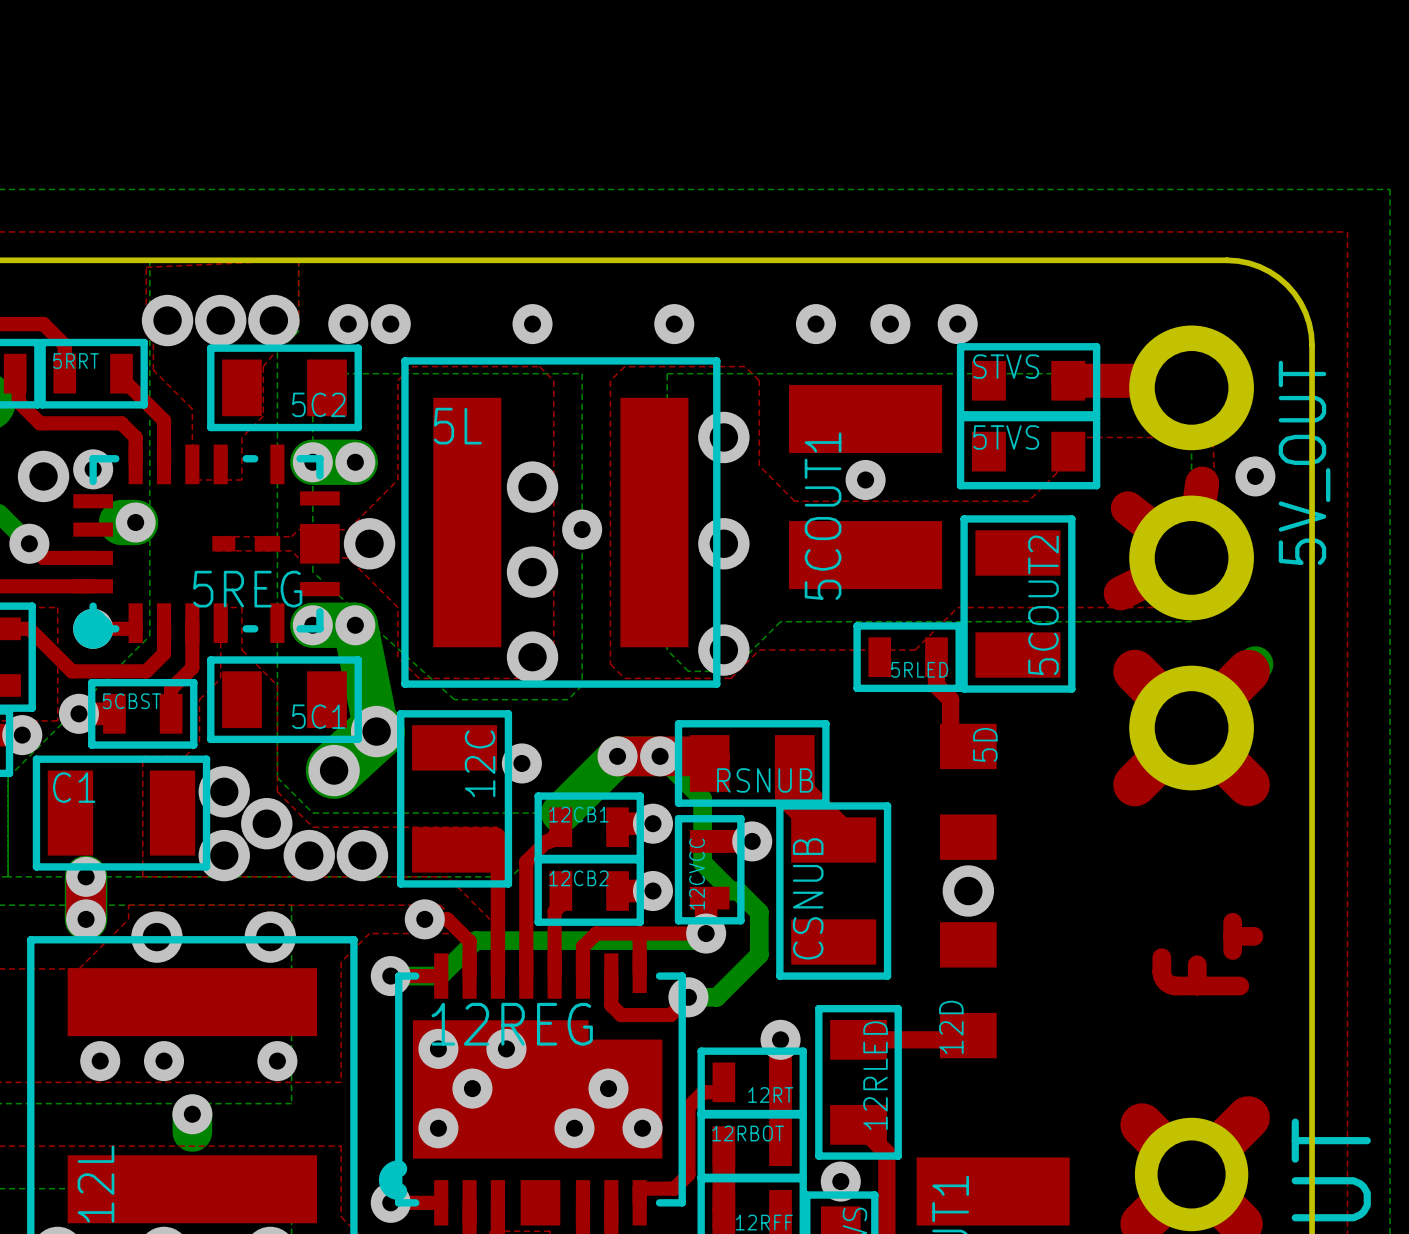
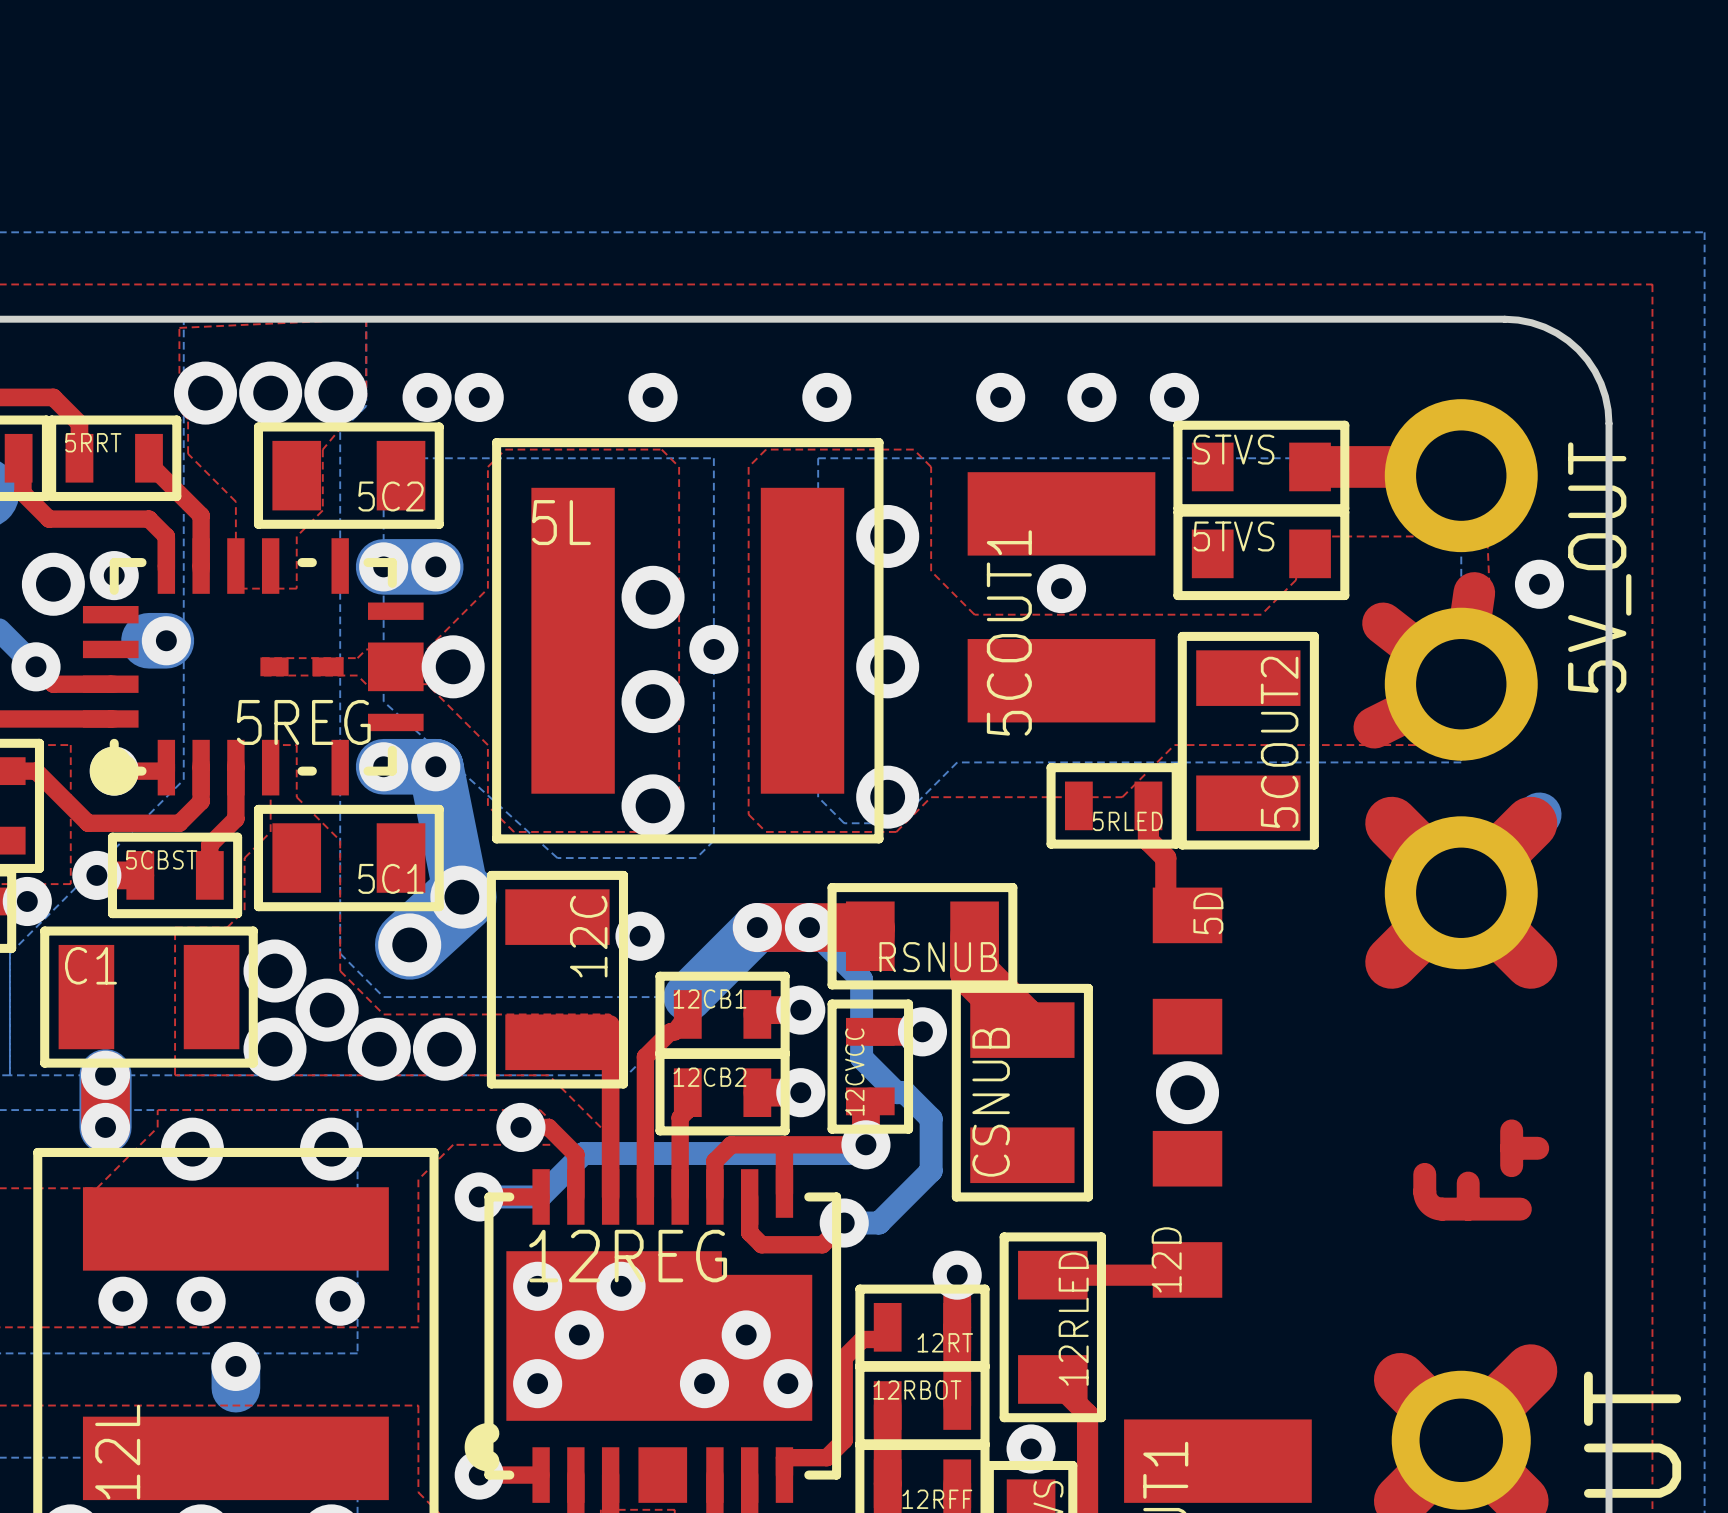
5REG footprint: [73, 444, 340, 649] -> [82, 538, 424, 796]

